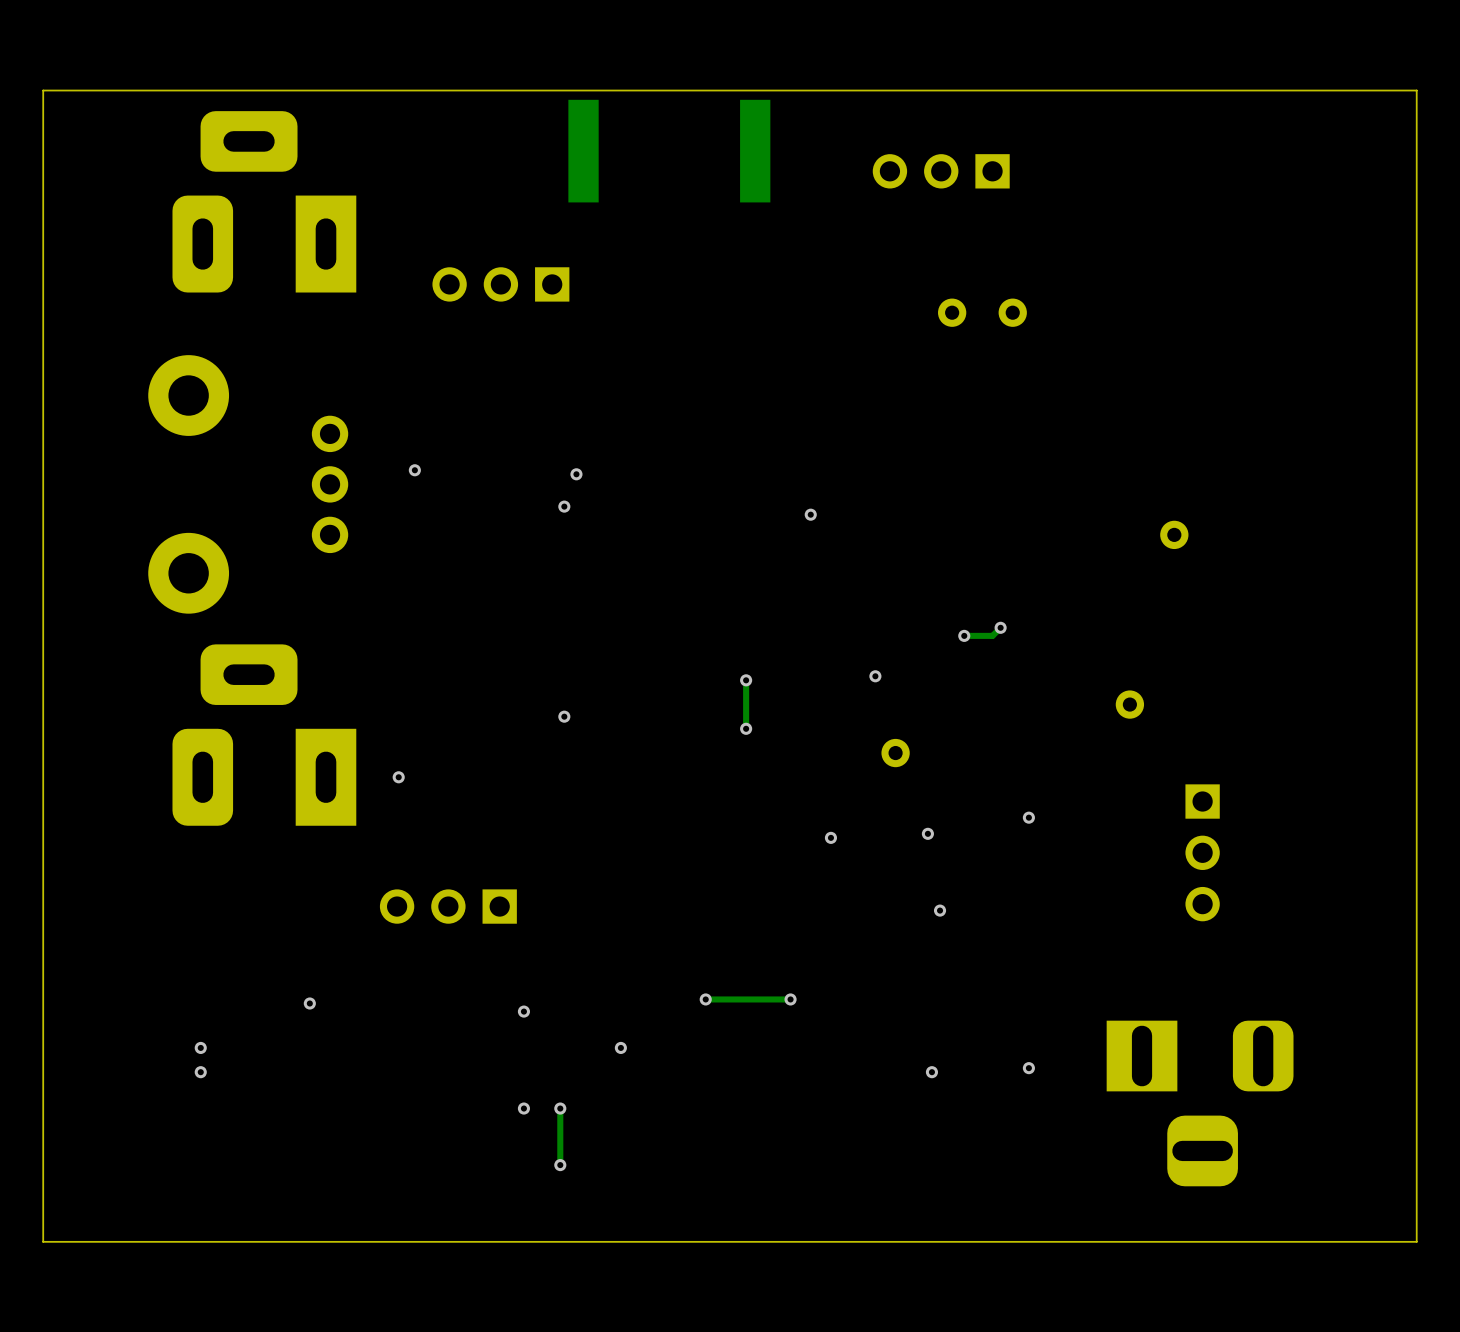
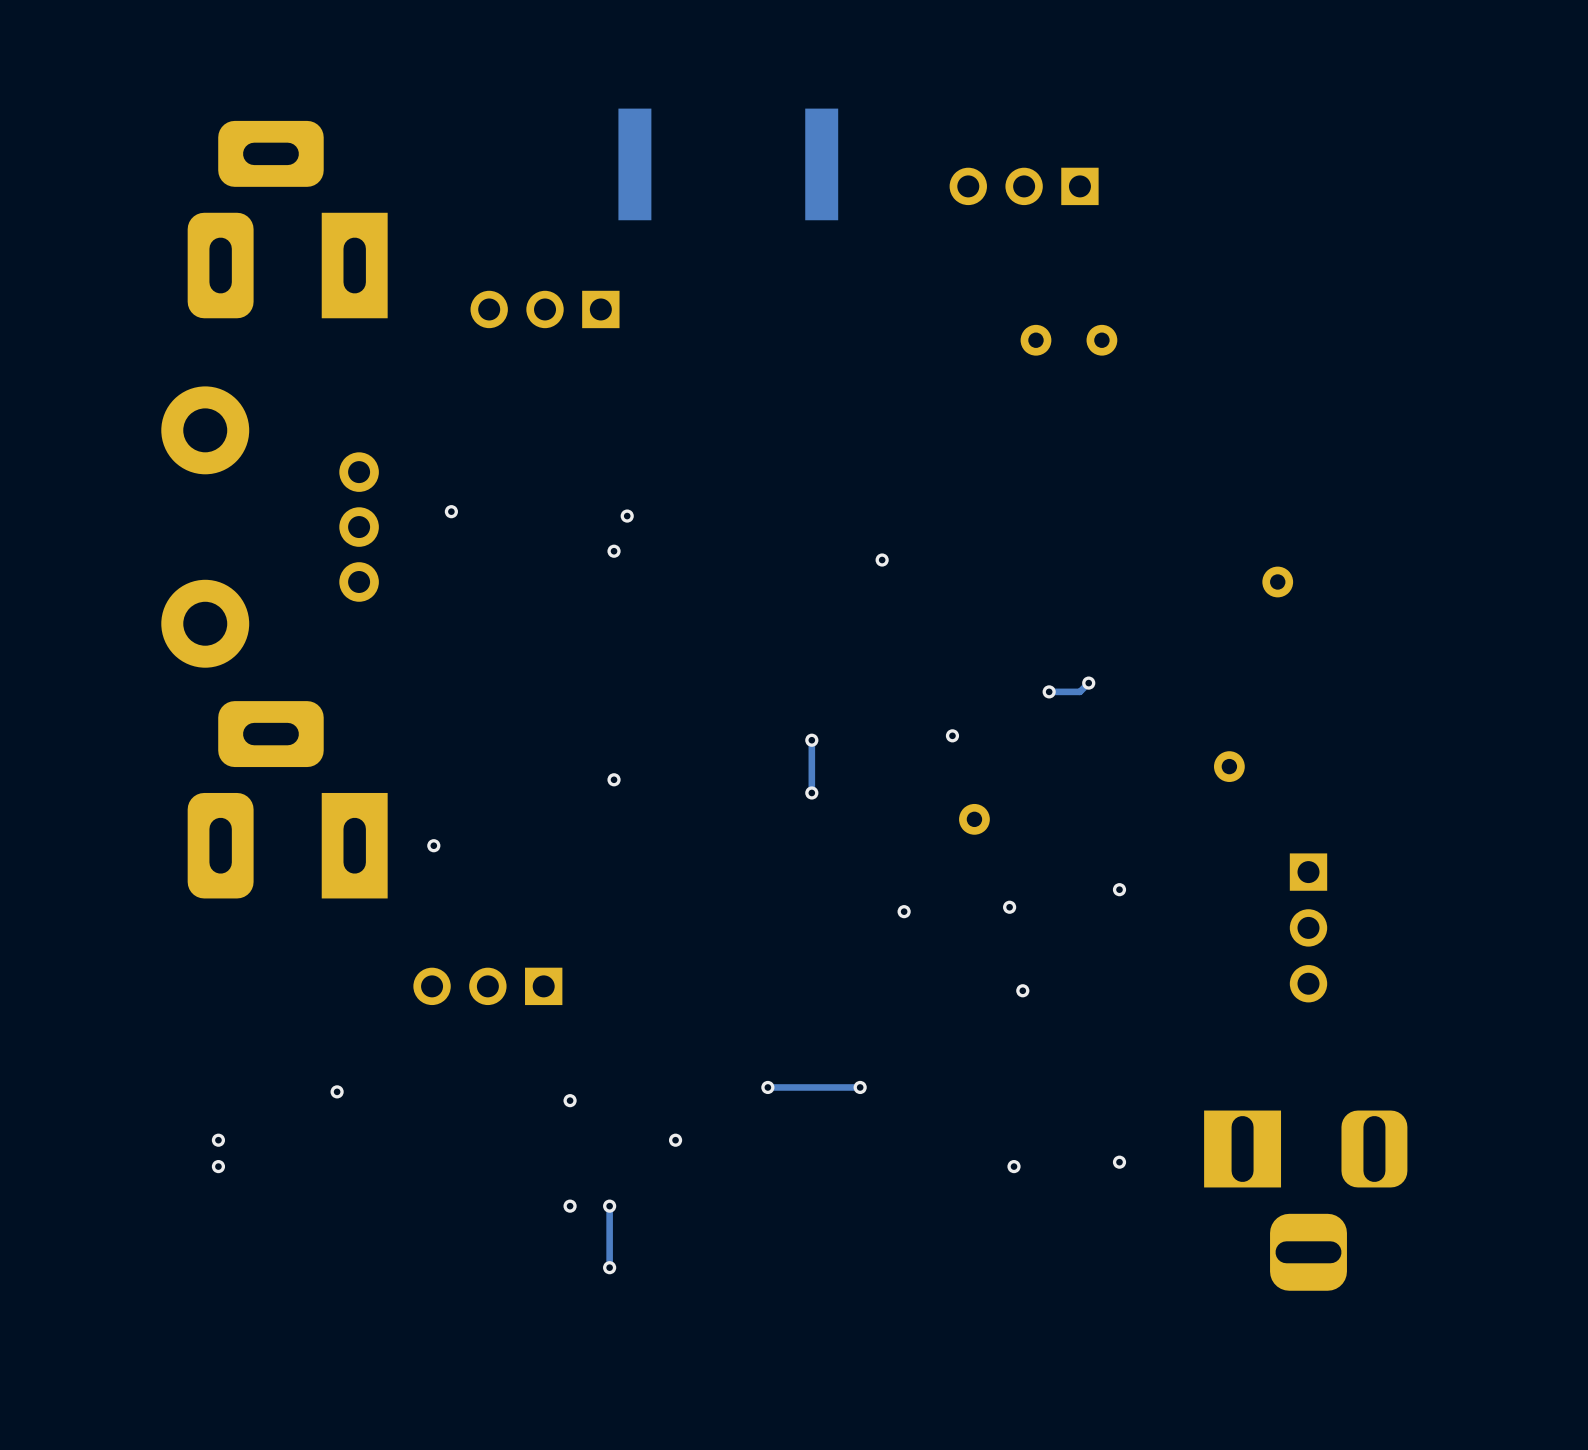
board edge: (1416, 90) (1416, 1241) (43, 1241) (43, 90) (1416, 90) -> none

